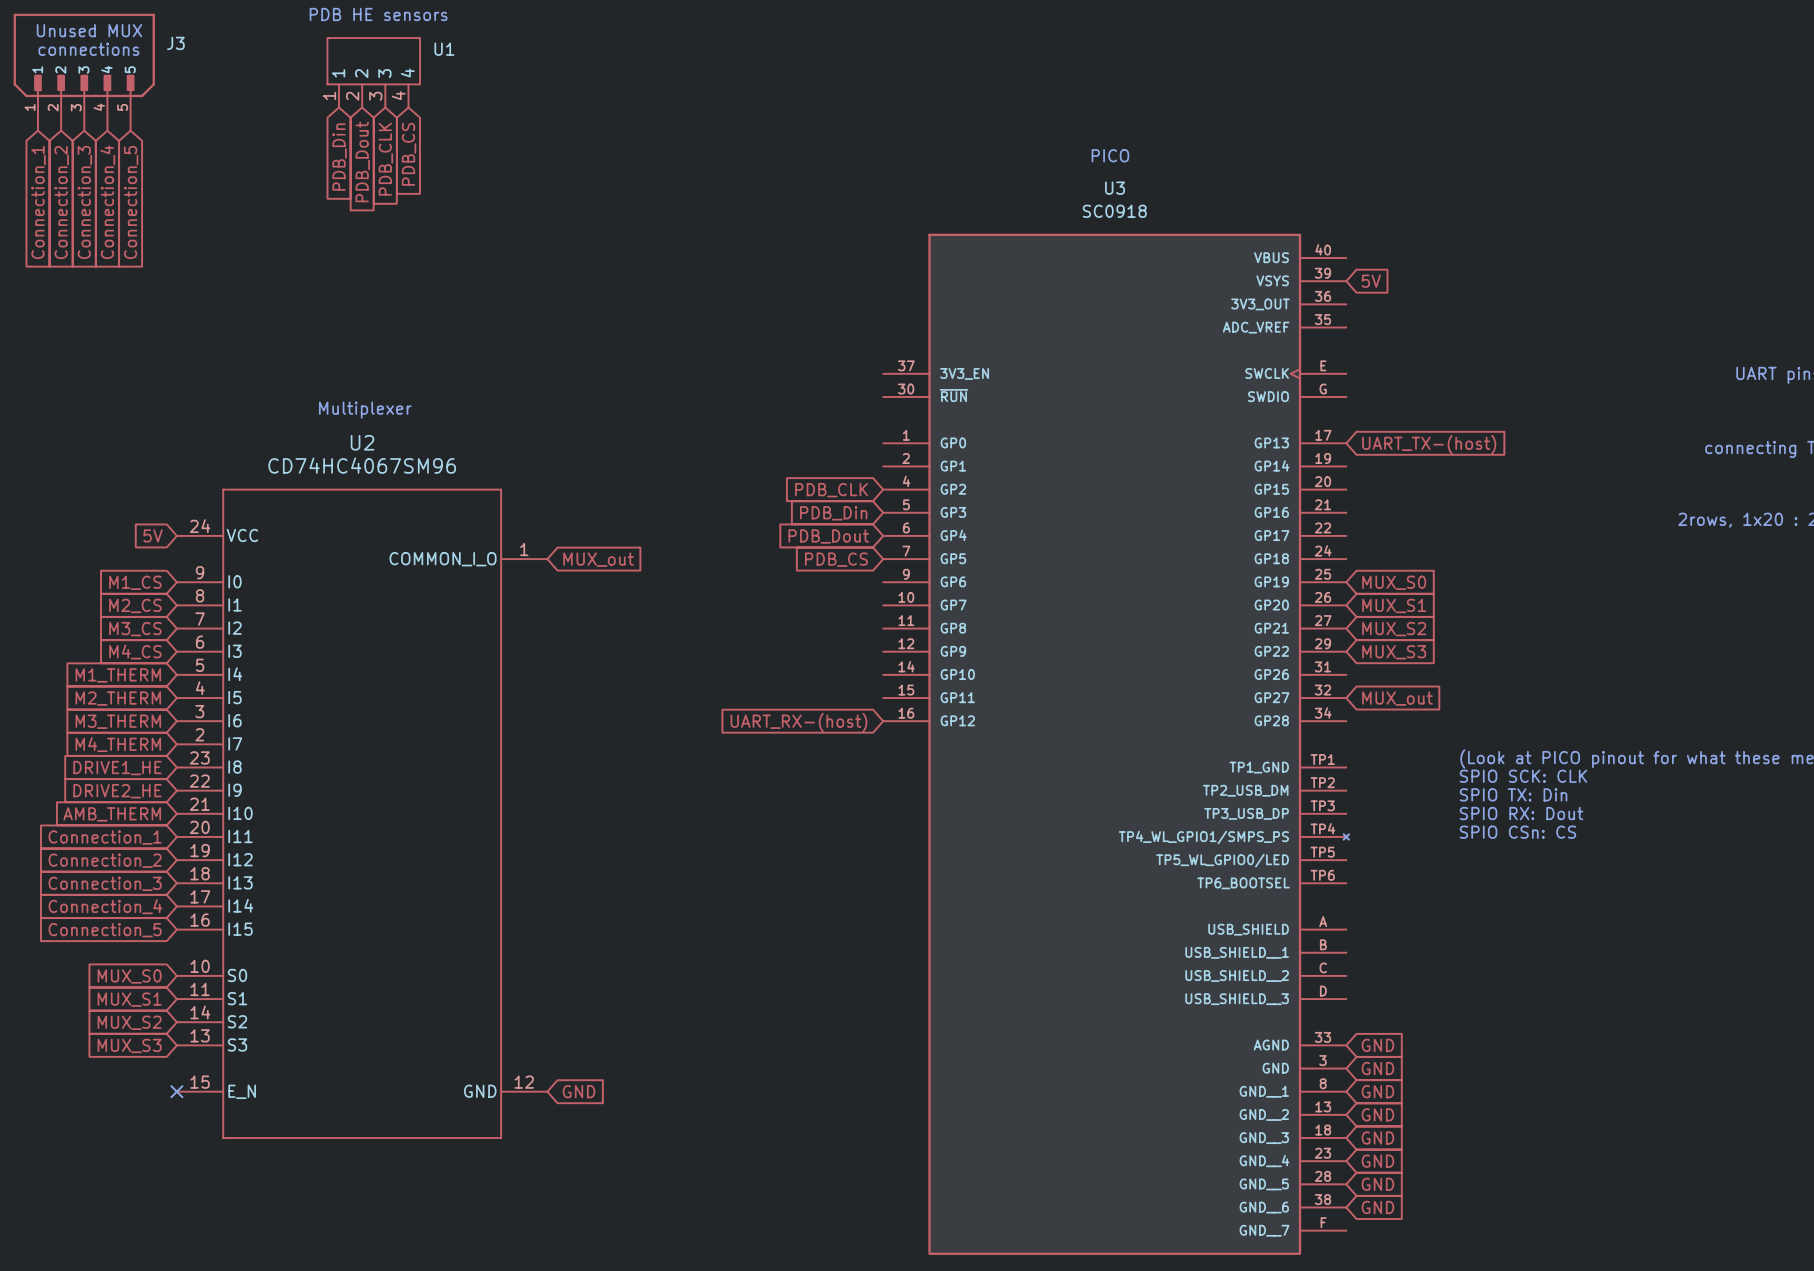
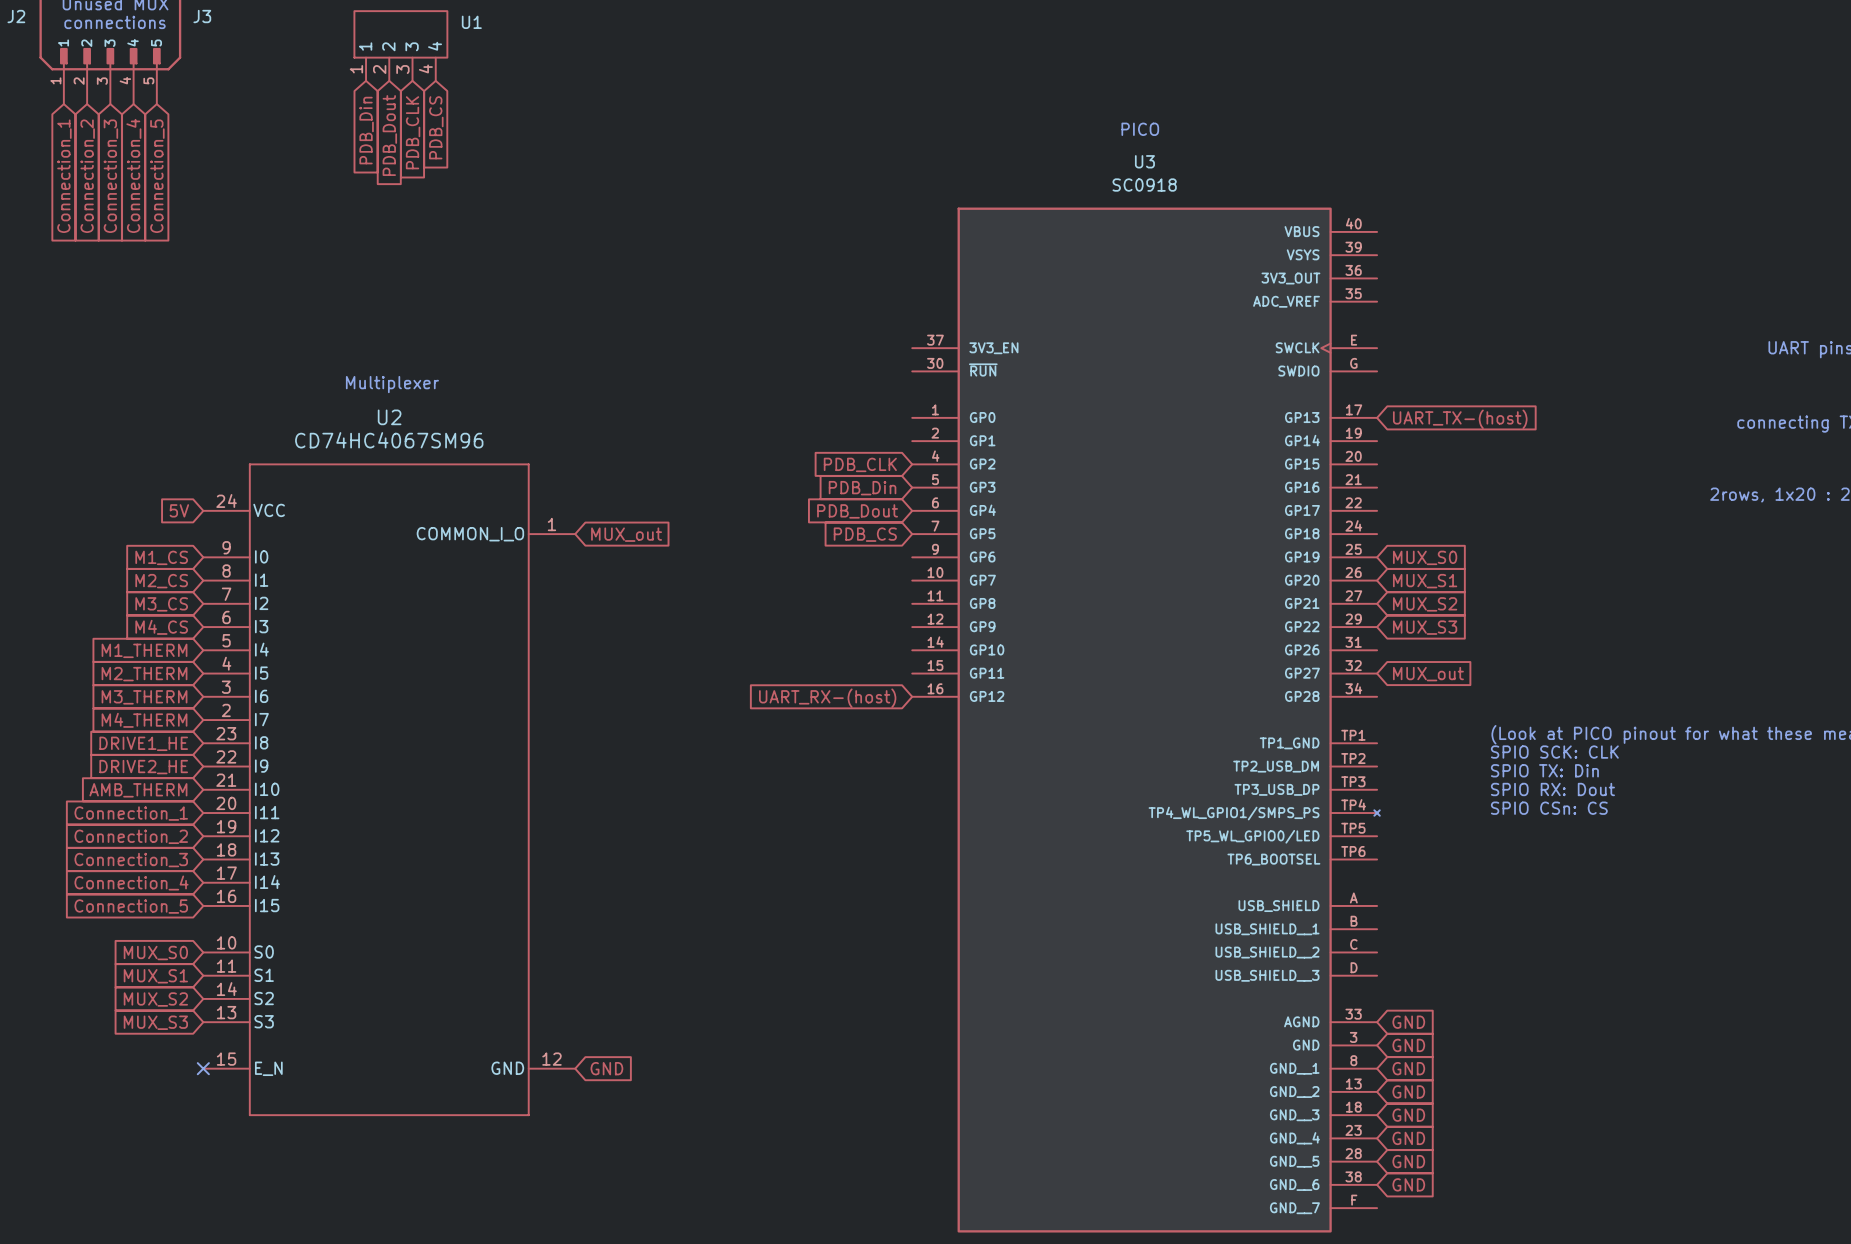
global label: 5V (1371, 281) -> none

